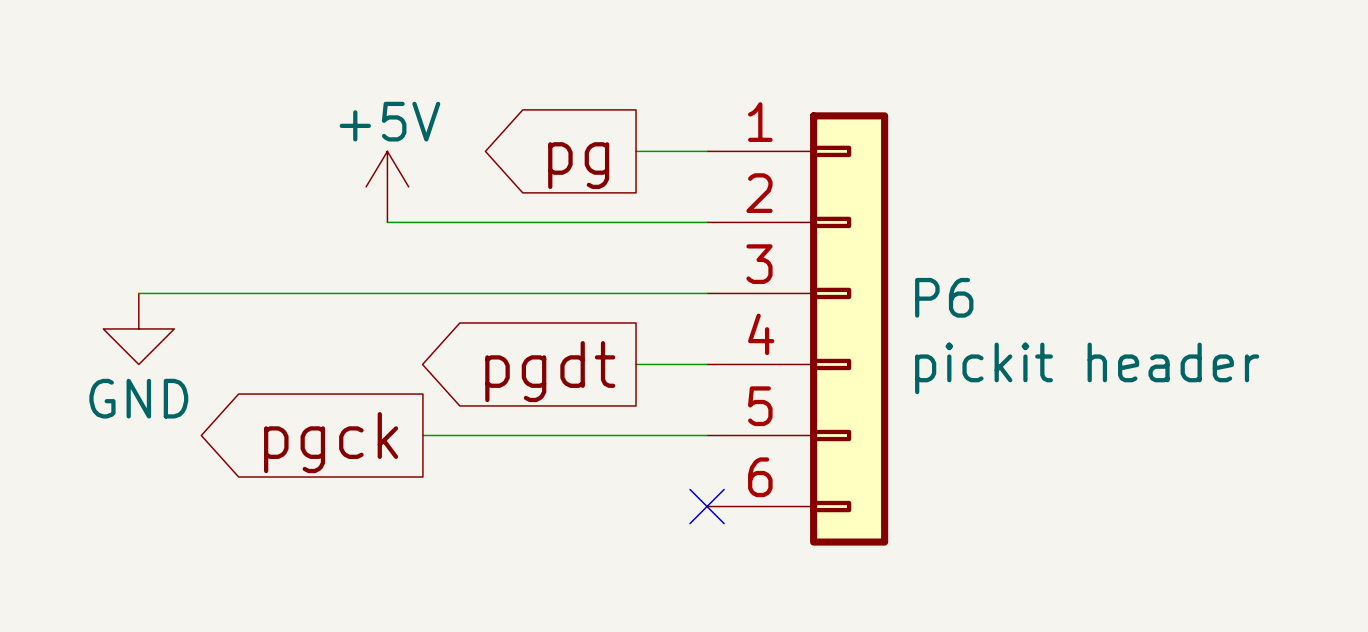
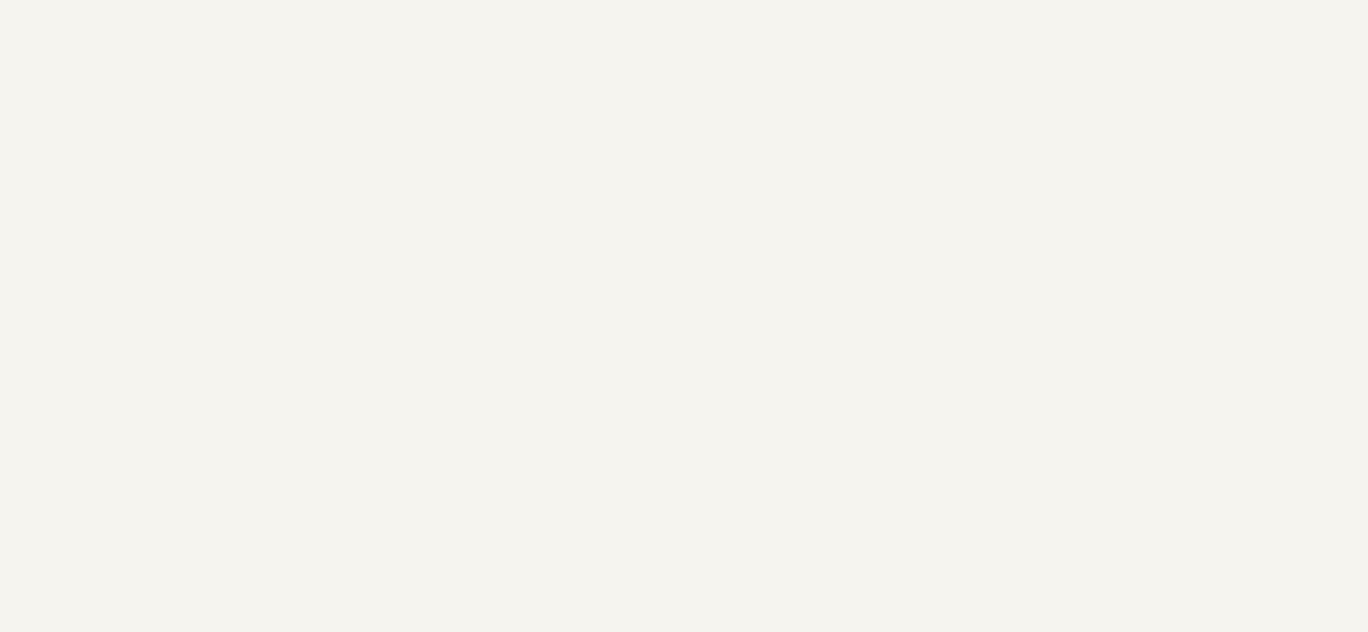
wire: (636, 151) (707, 151) -> none
global label: pg (578, 165) -> none
power symbol: +5V (387, 186) -> none
wire: (387, 222) (707, 222) -> none
wire: (138, 293) (707, 293) -> none
power symbol: GND (138, 328) -> none
P6: pickit header (797, 328) -> none
wire: (636, 364) (707, 364) -> none
global label: pgdt (550, 371) -> none
wire: (422, 435) (707, 435) -> none
global label: pgck (331, 442) -> none
no-connect mark: (707, 506) -> none

